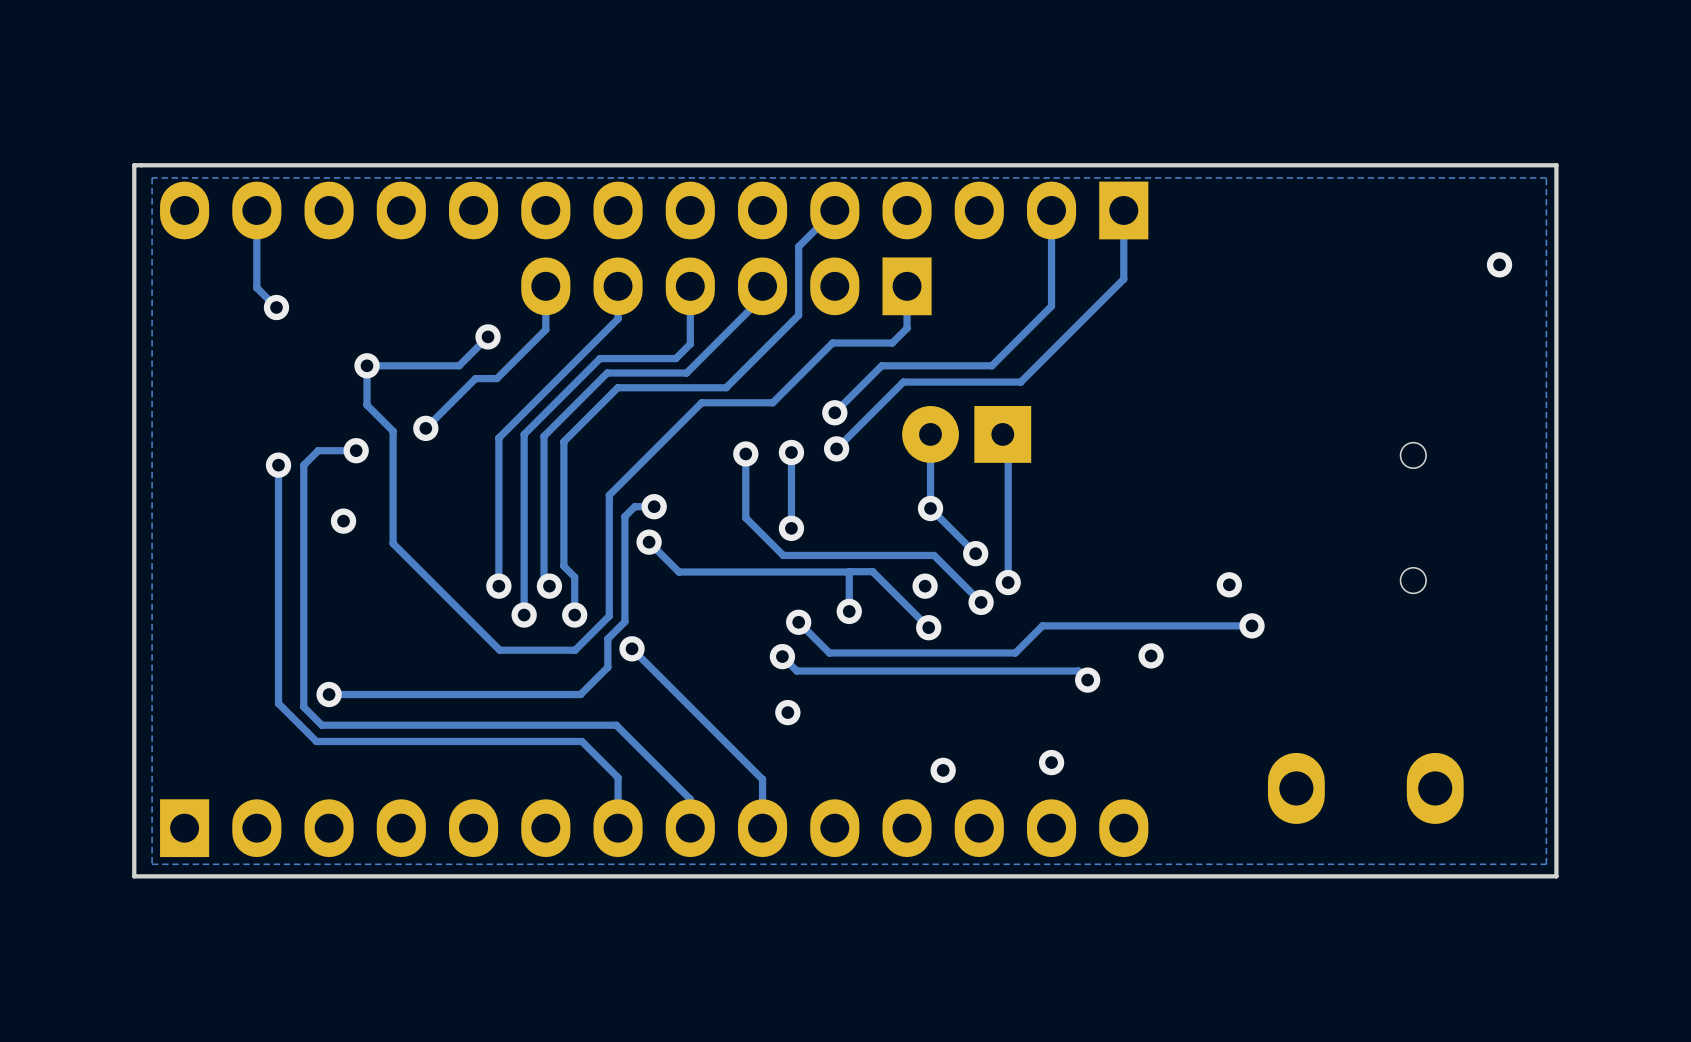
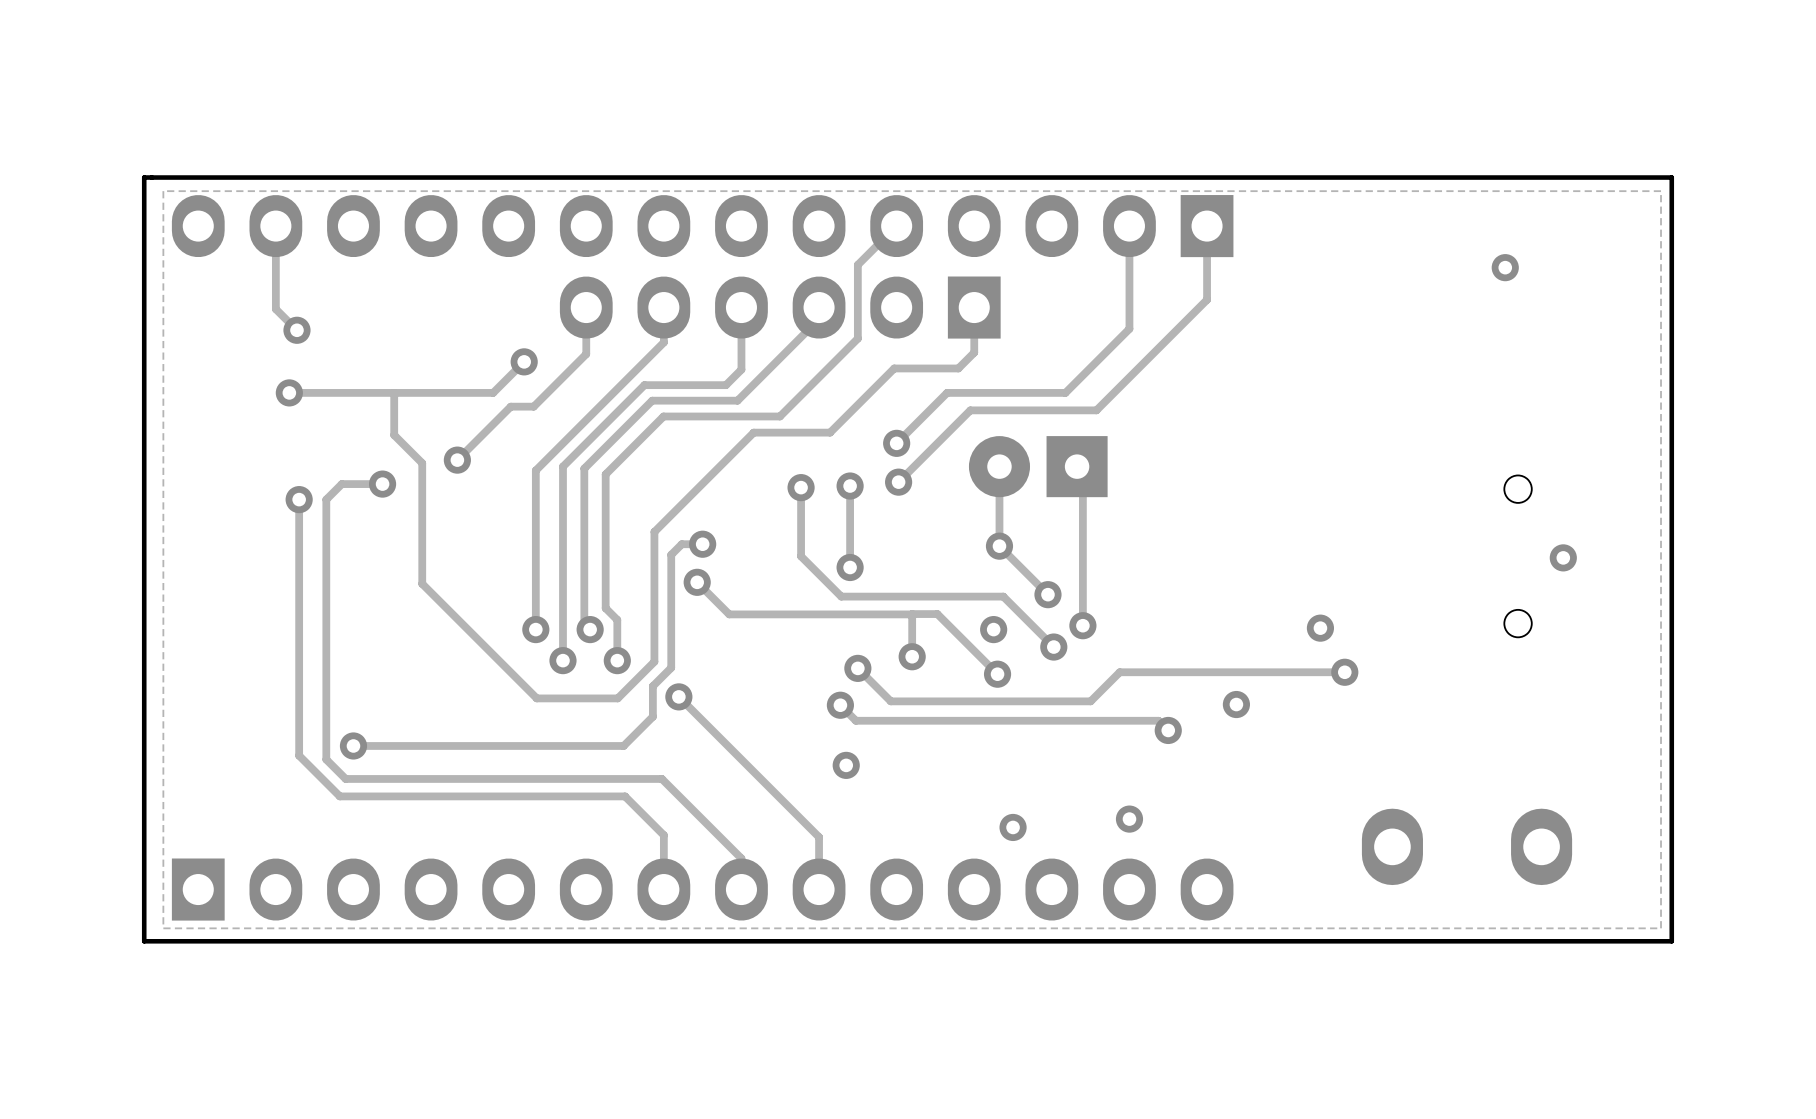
via position: (1499, 264) -> (1505, 267)
via: none -> (289, 392)
track: none -> (394, 392) (289, 392)
via: (367, 365) -> none
via: none -> (1563, 557)
via: (343, 521) -> none

